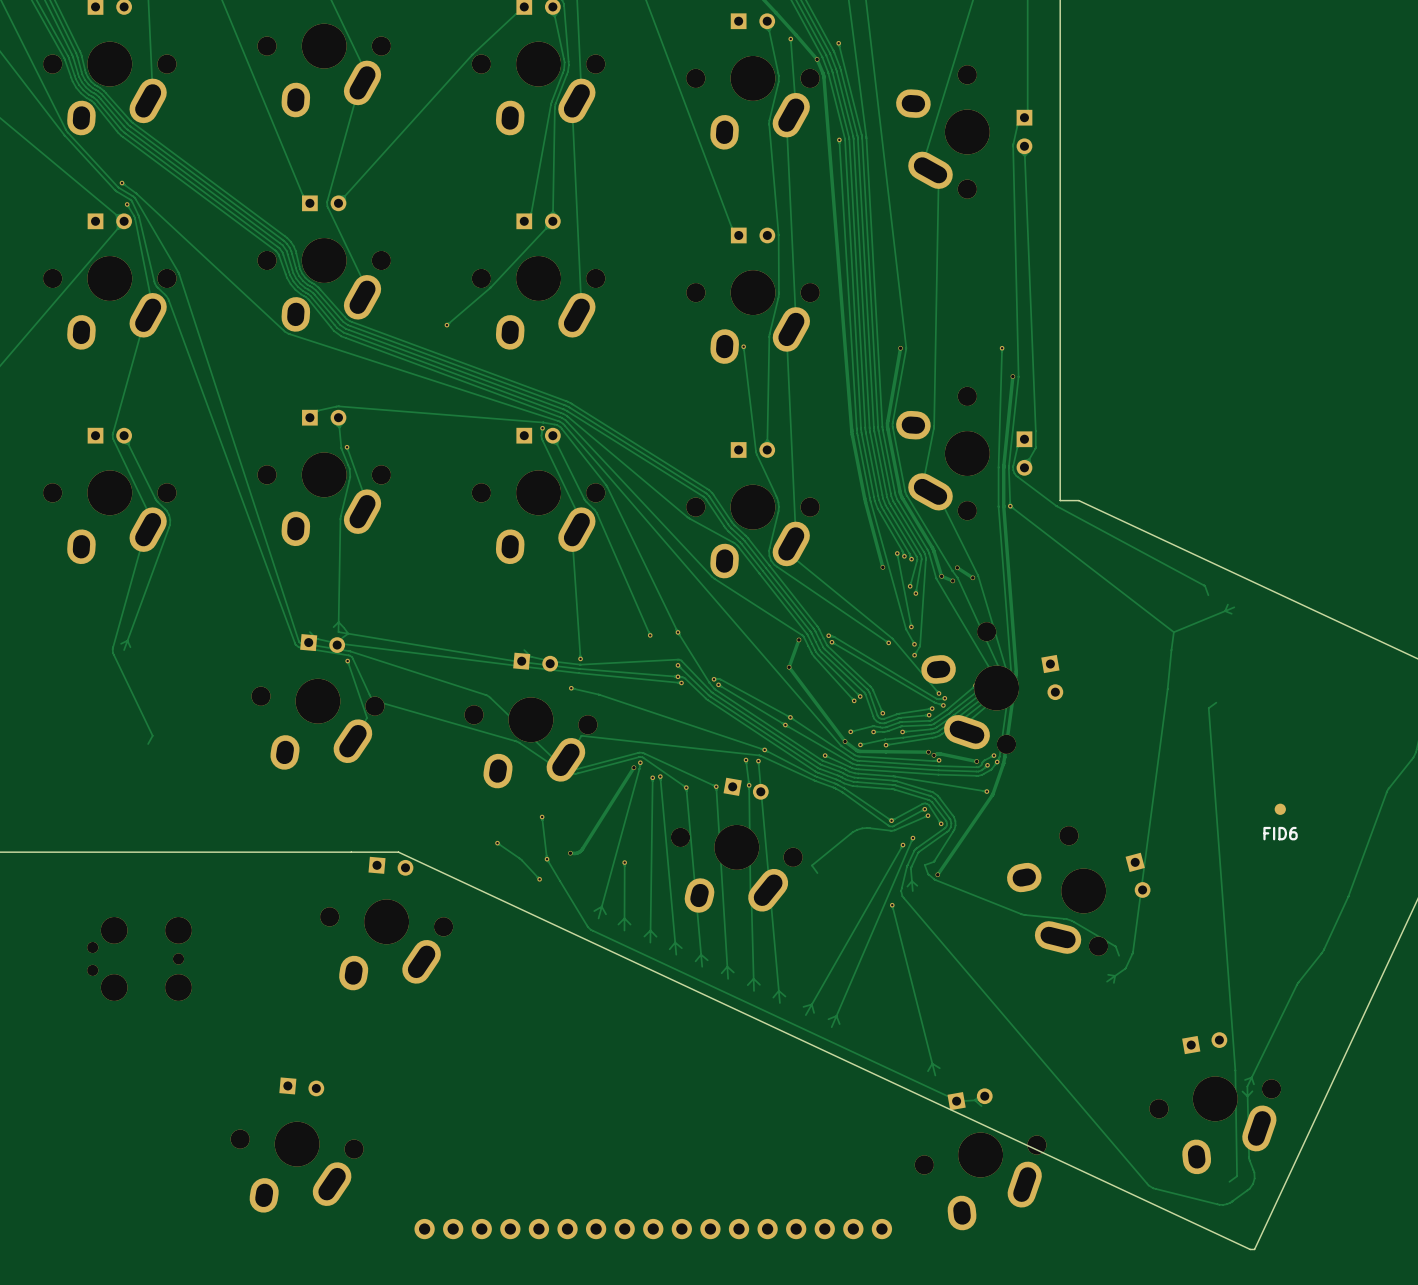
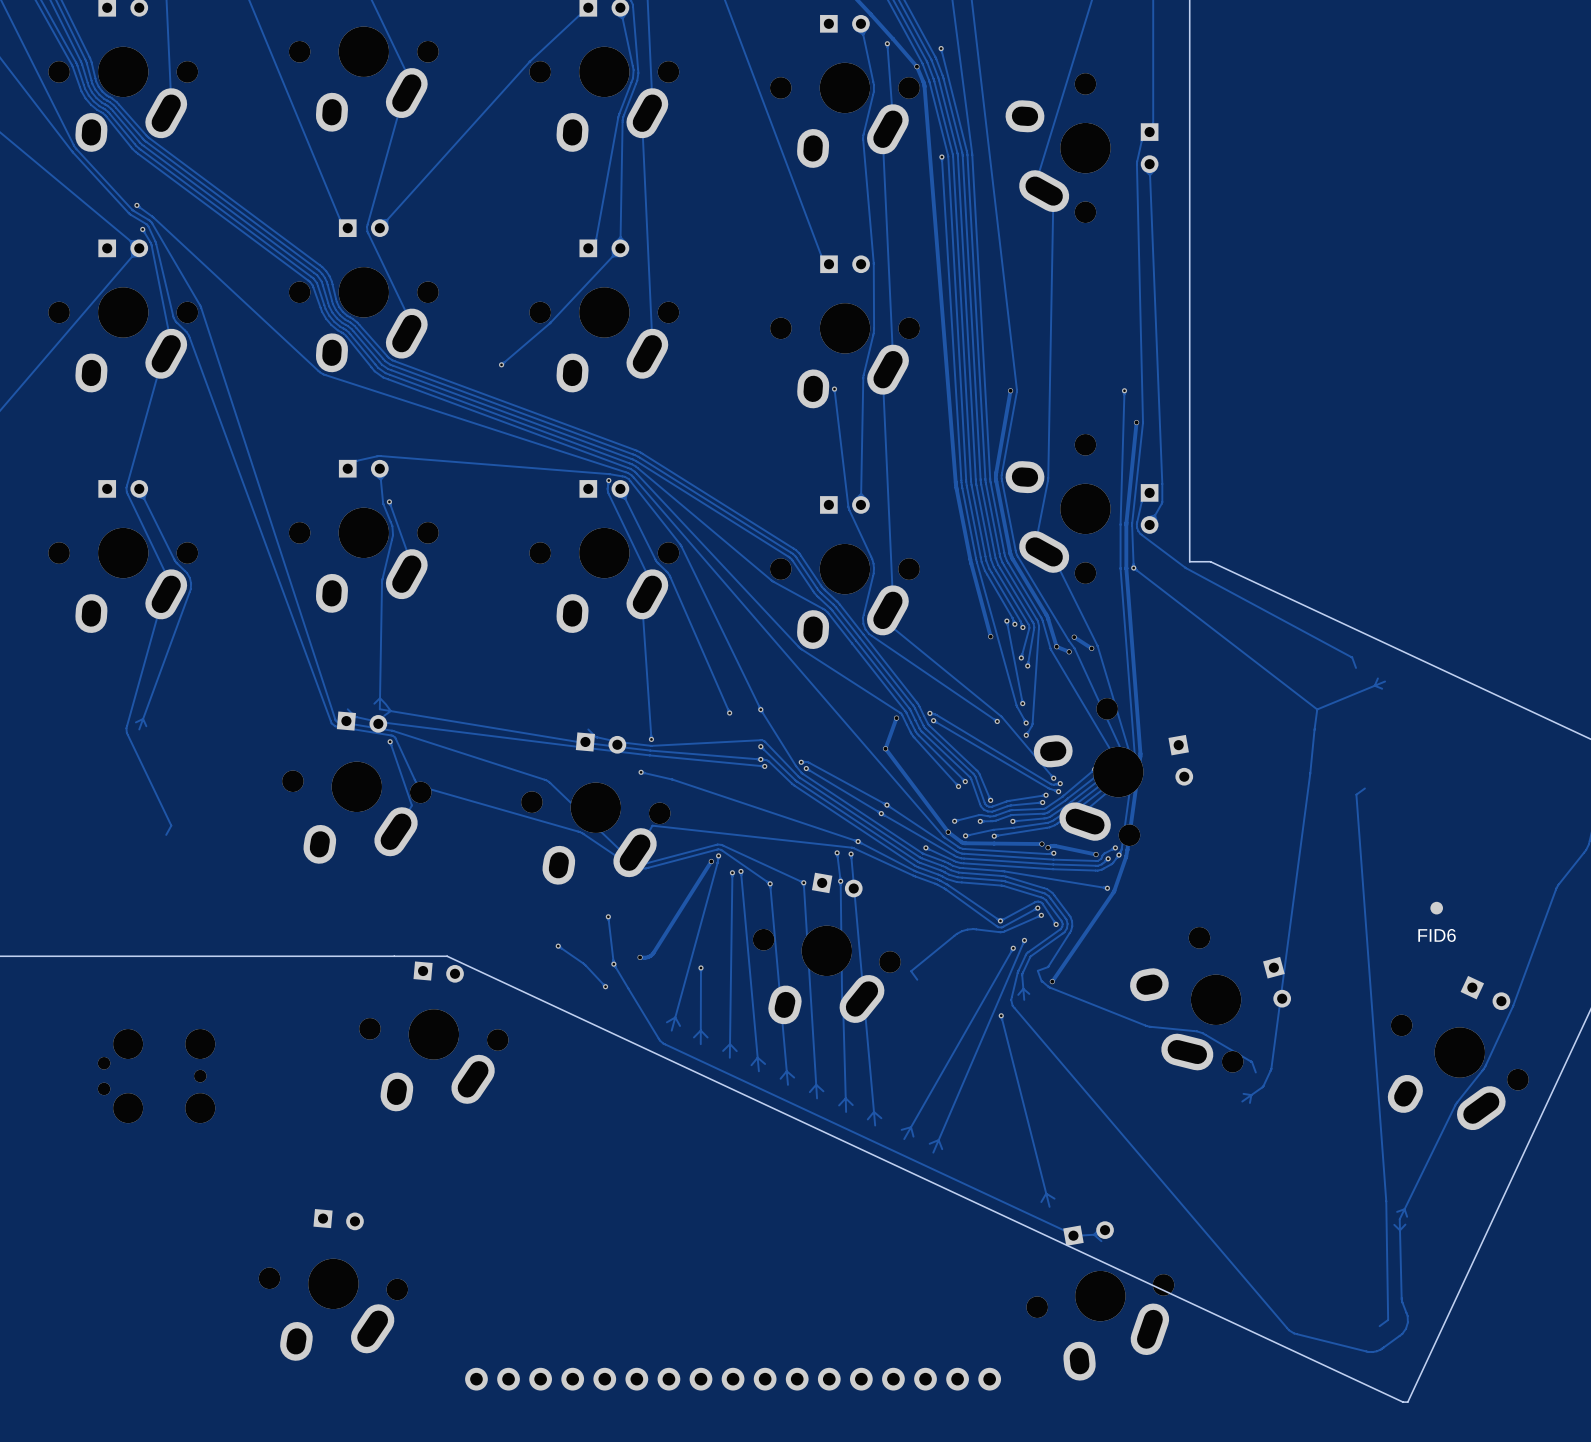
part: none -> (1485, 992)
part: none -> (1458, 1072)
part: (1204, 1043) -> none
part: (1215, 1125) -> none

